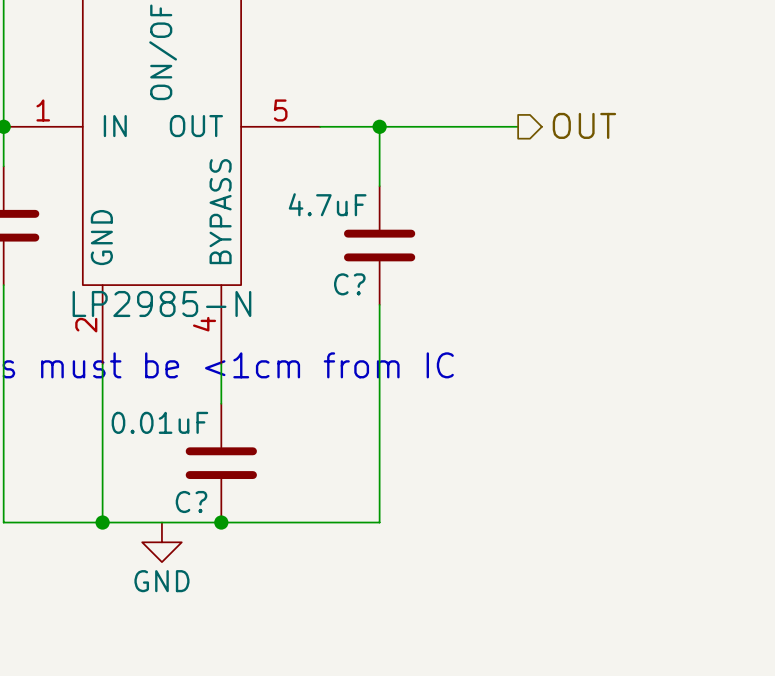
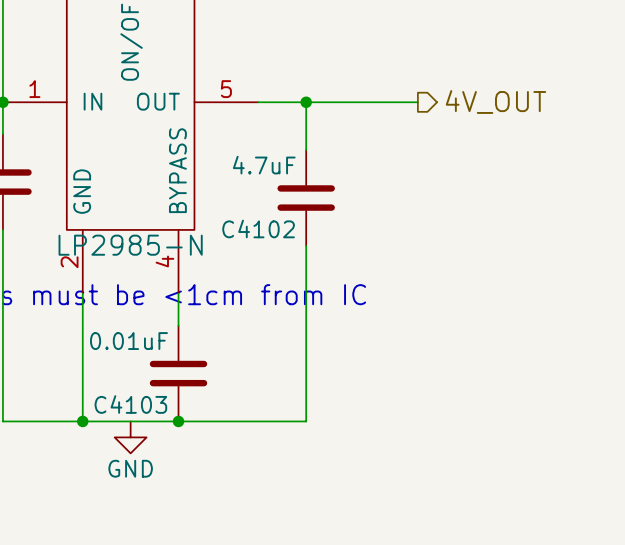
hierarchical label: OUT (584, 125) -> 4V_OUT (495, 102)
C? name: C? (349, 284) -> C4102 (258, 228)
C? name: C? (191, 502) -> C4103 (130, 404)

